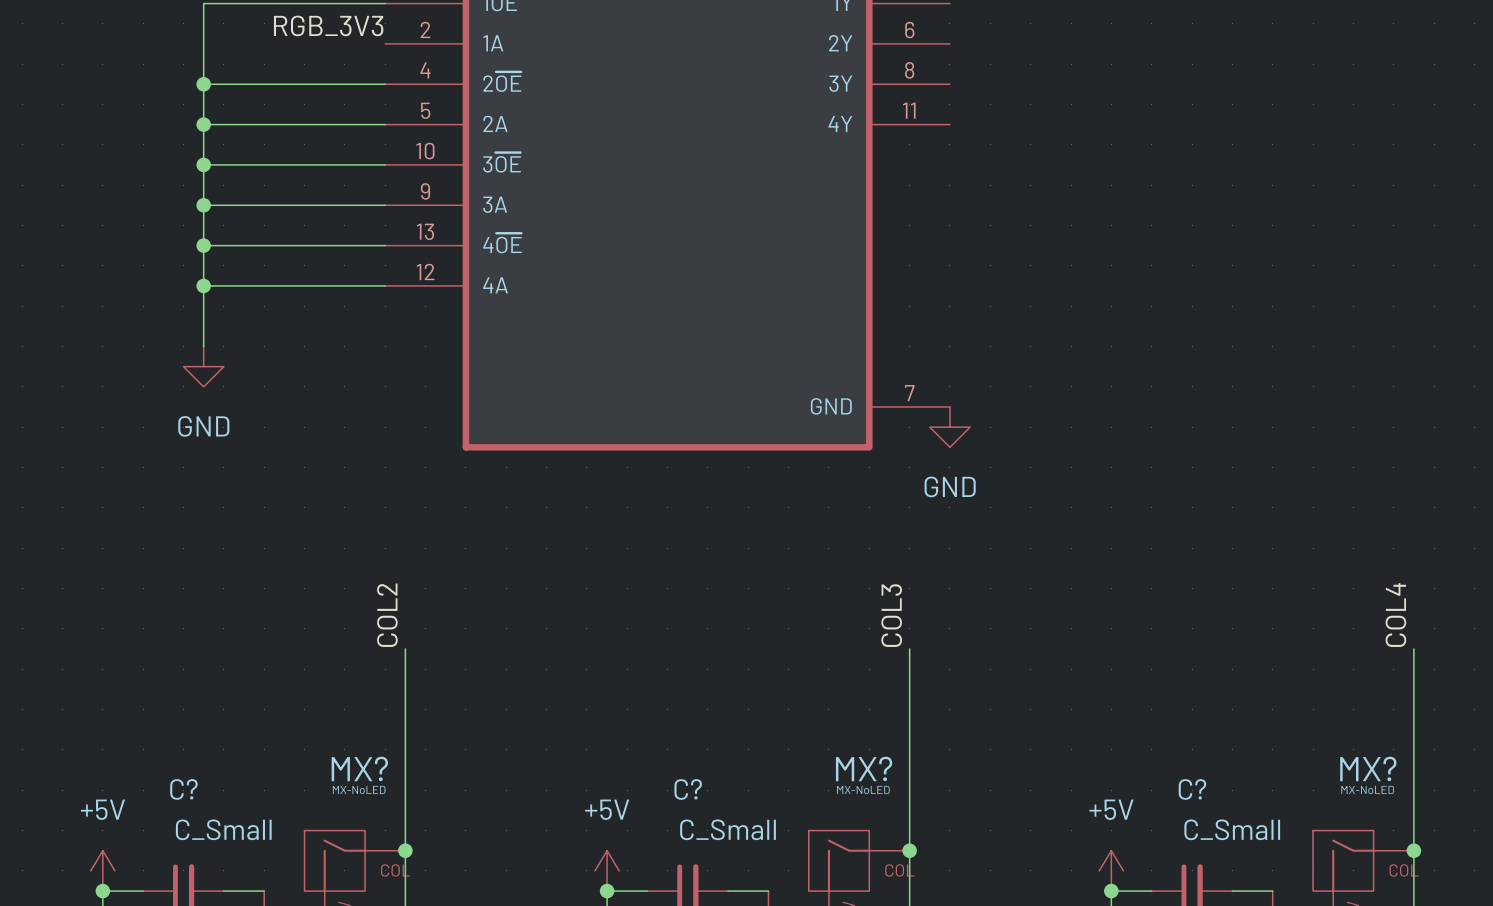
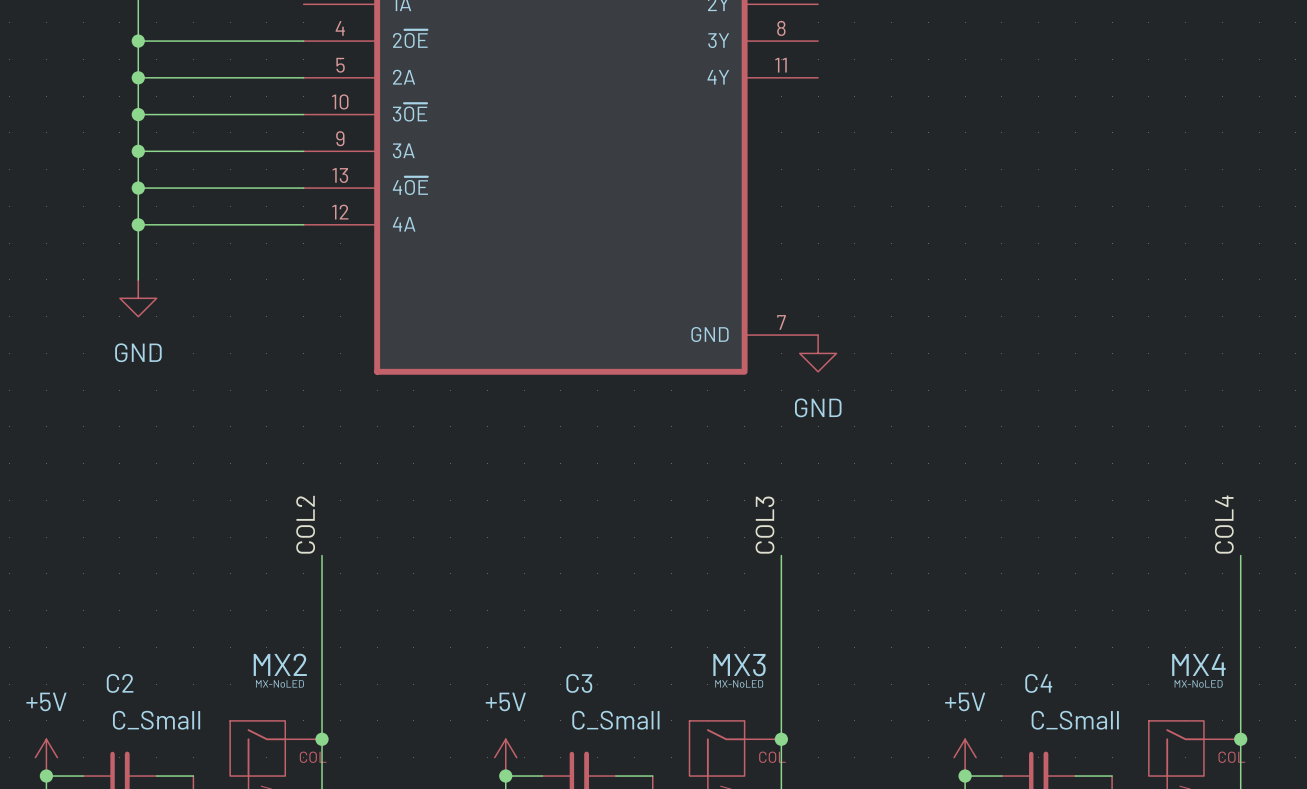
MX? name: MX? (359, 768) -> MX2 (280, 664)
MX? name: MX? (864, 768) -> MX3 (739, 665)
MX? name: MX? (1368, 768) -> MX4 (1198, 664)
C? name: C? (183, 789) -> C2 (120, 683)
C? name: C? (688, 789) -> C3 (579, 683)
C? name: C? (1192, 789) -> C4 (1038, 683)

